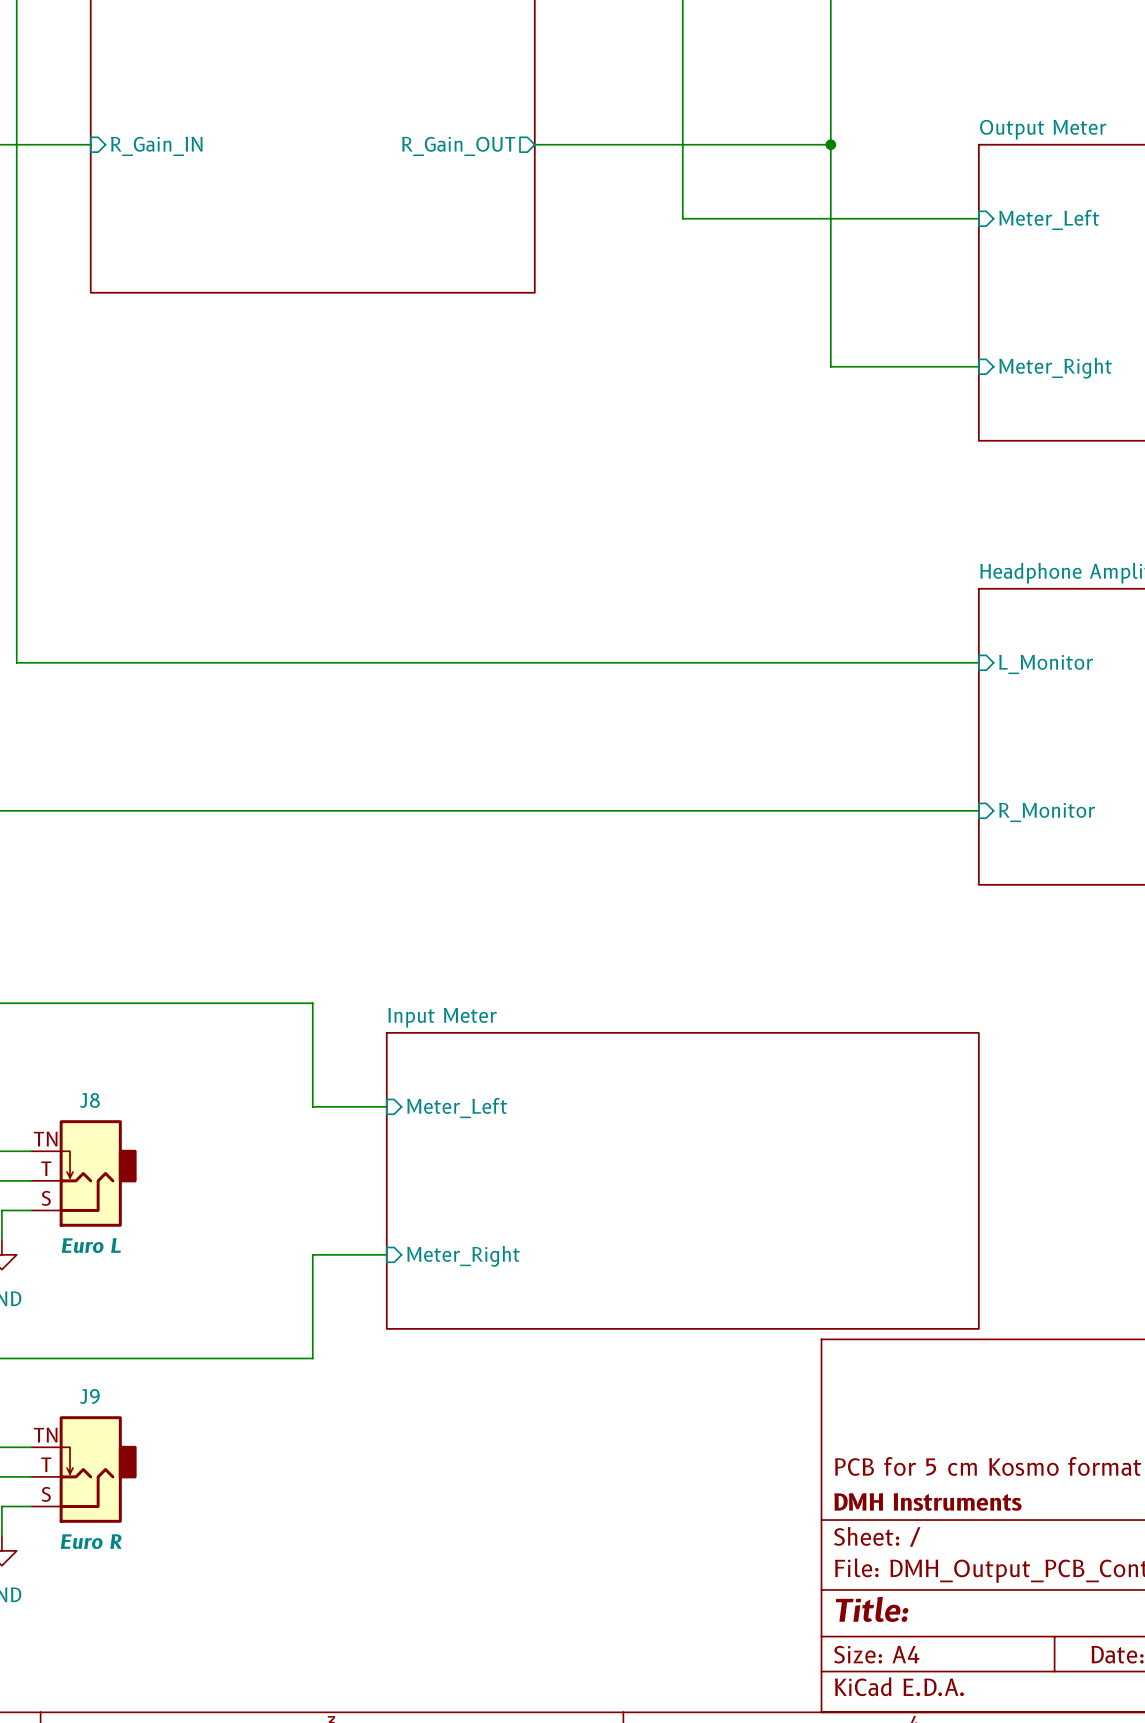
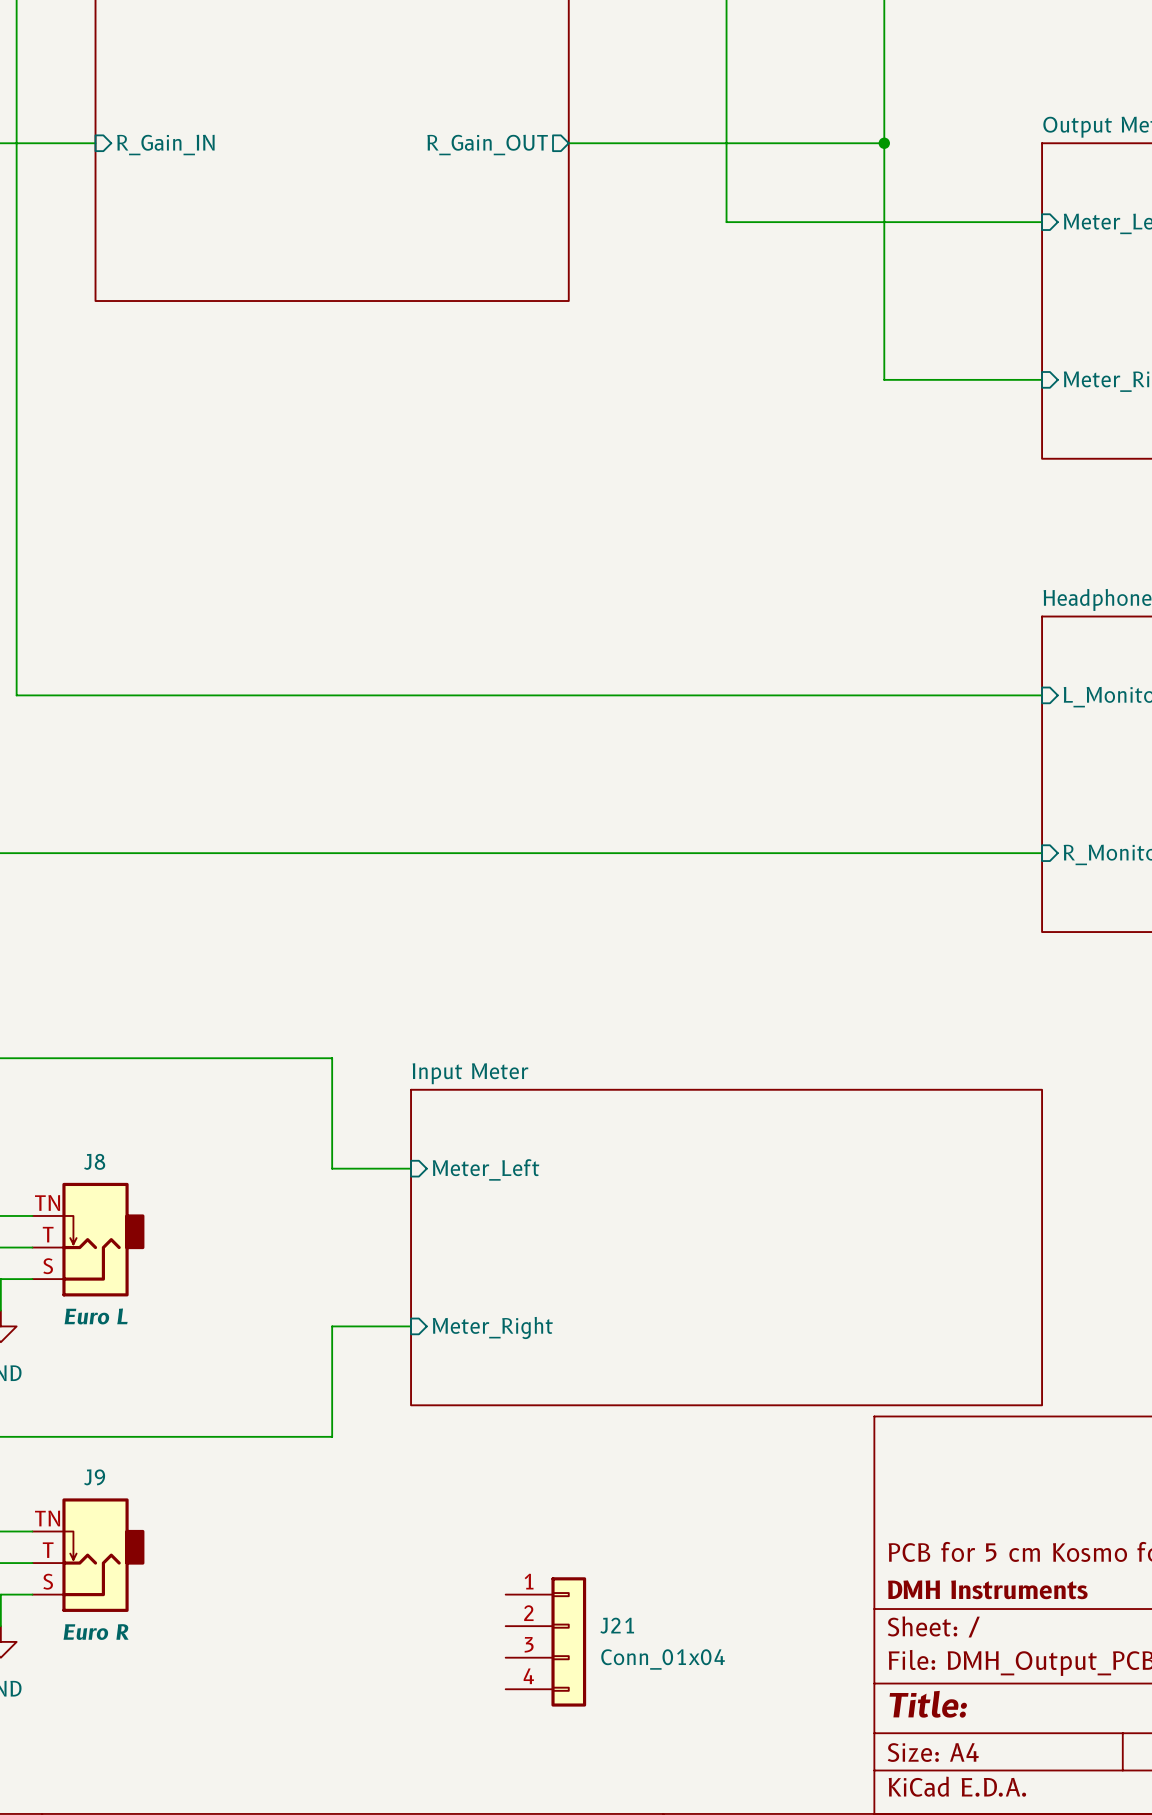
J21: none -> Conn_01x04 (545, 1641)

